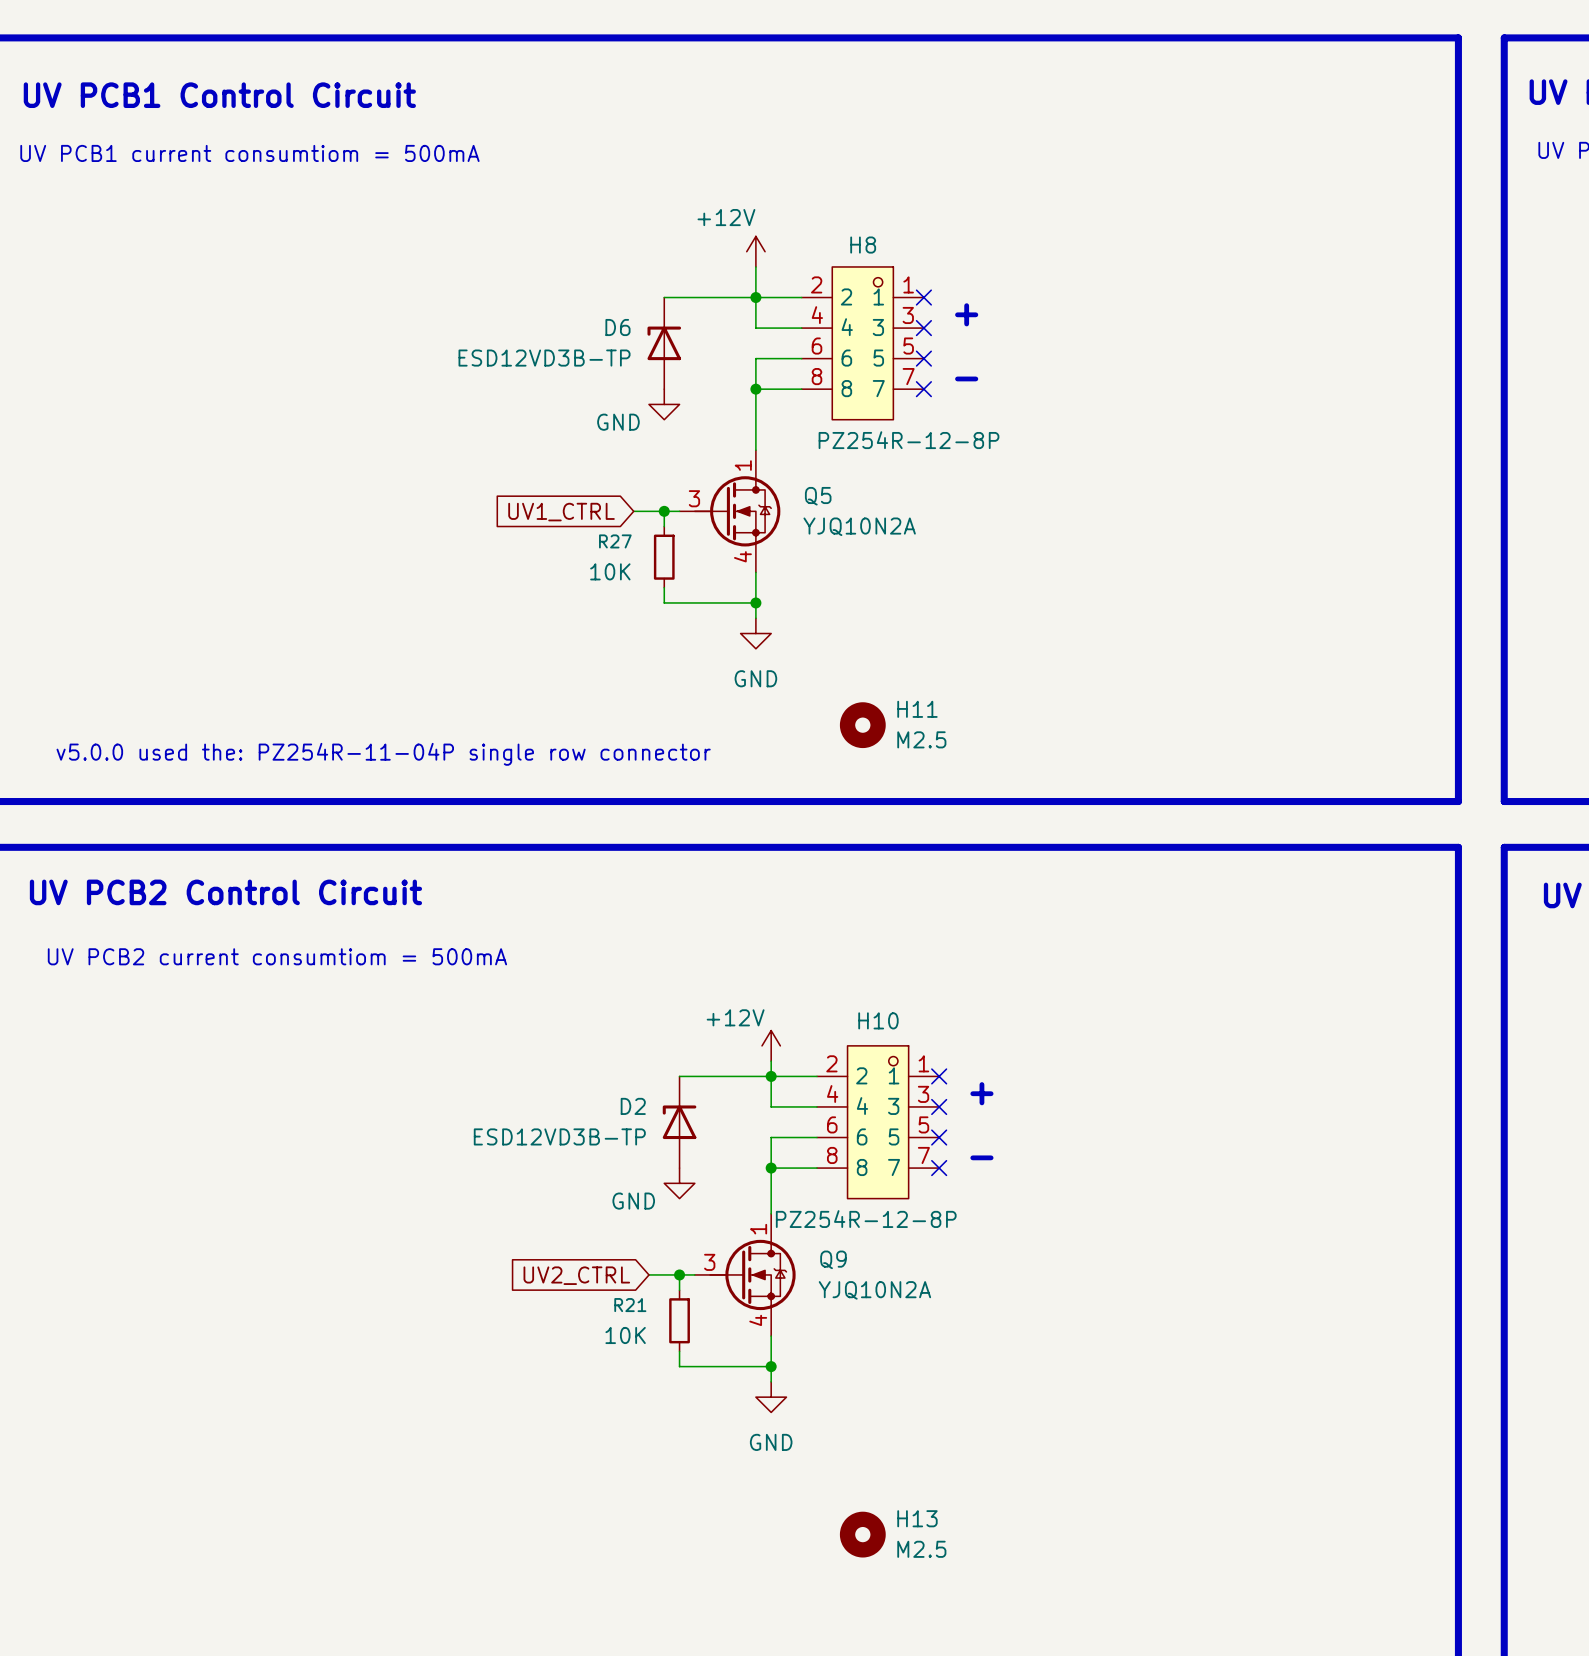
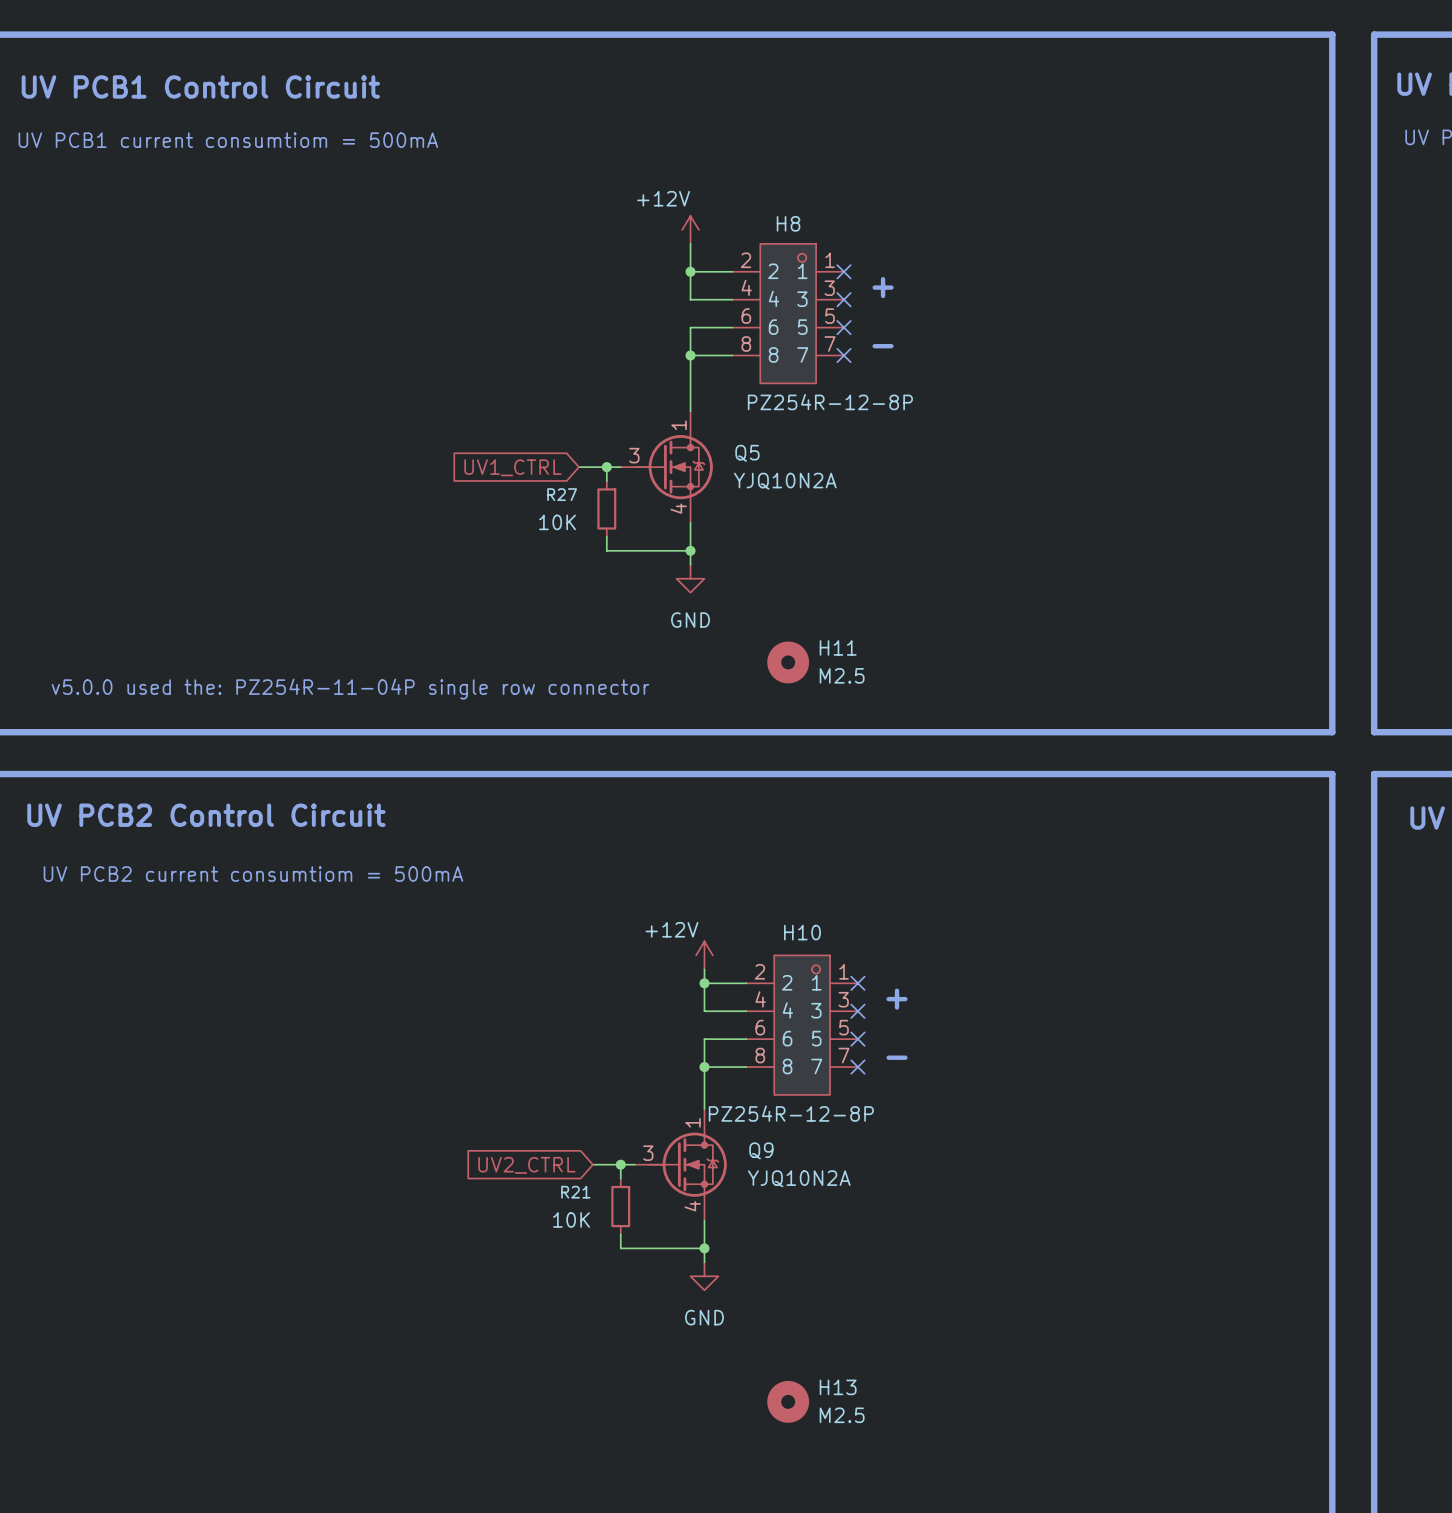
wire: (664, 297) (755, 297) -> none
D6: ESD12VD3B-TP (664, 343) -> none
power symbol: GND (664, 404) -> none
wire: (679, 1076) (771, 1076) -> none
D2: ESD12VD3B-TP (679, 1122) -> none
power symbol: GND (679, 1183) -> none

